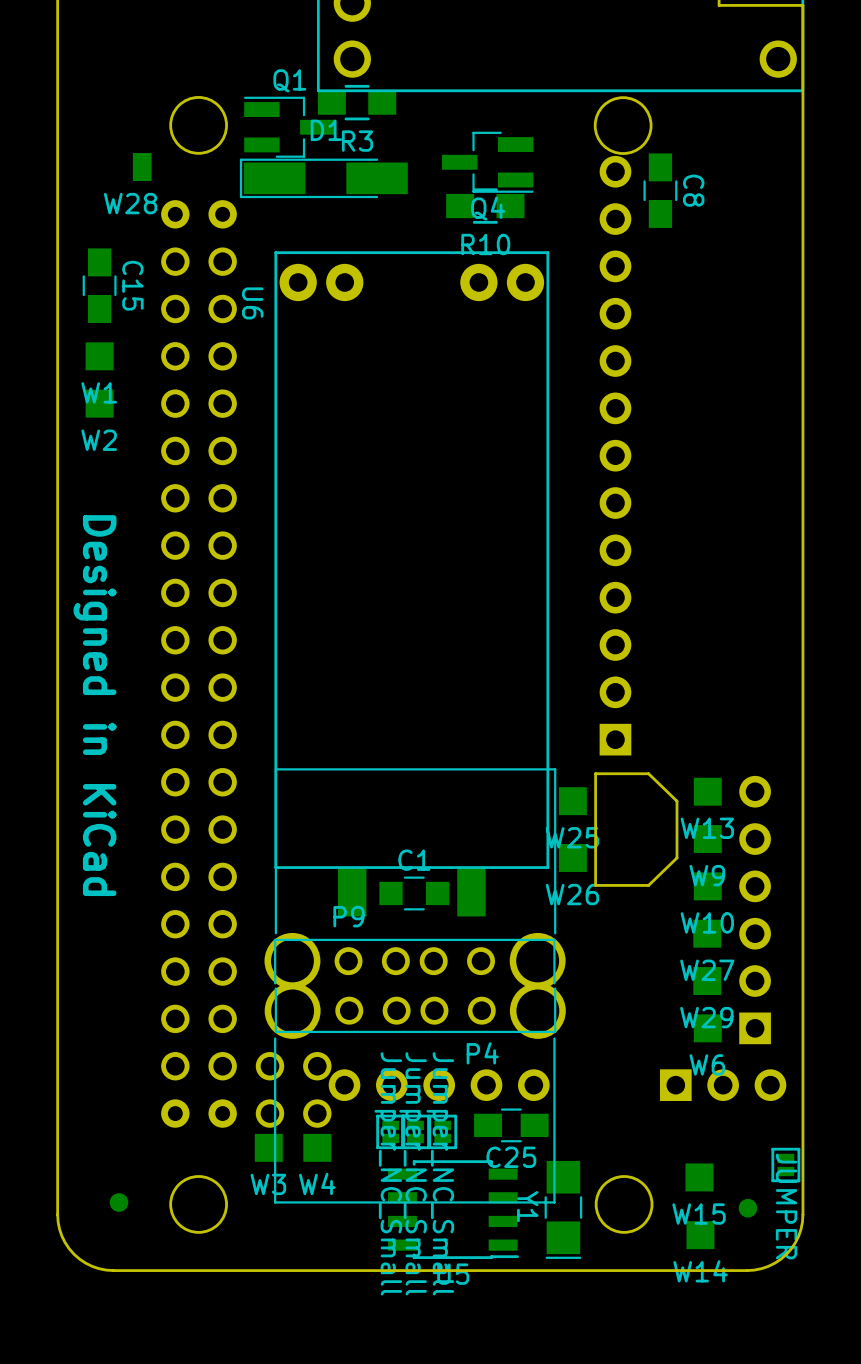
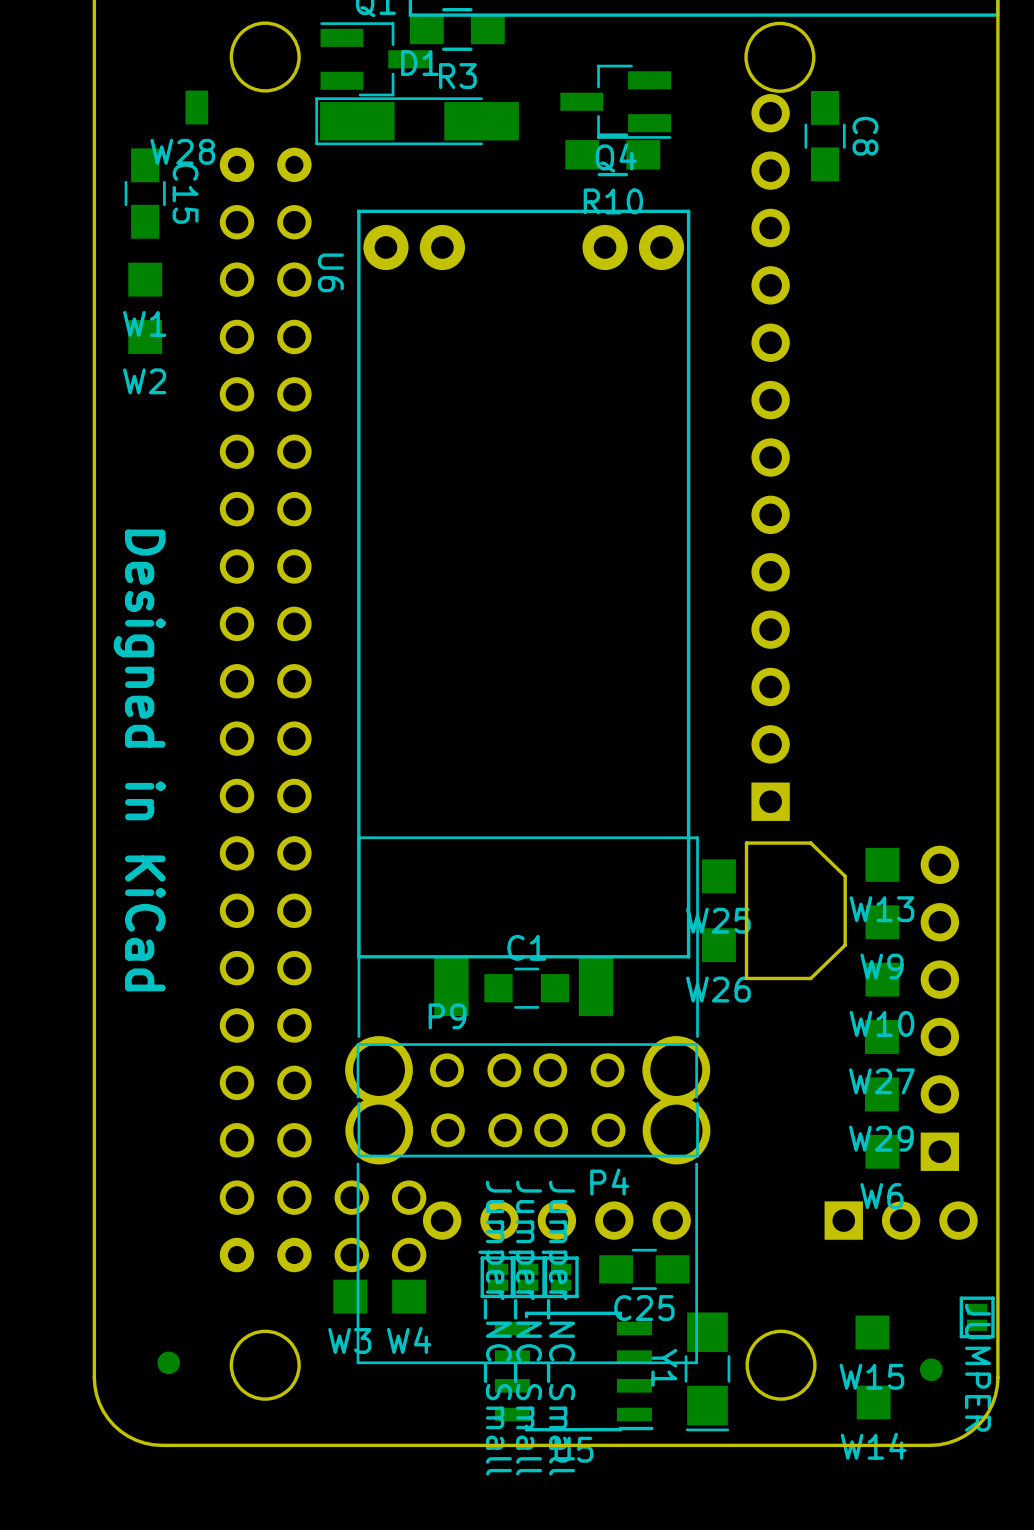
C15 position: (99, 285) -> (145, 193)
W1: none -> (145, 279)
W1 name: W1 (99, 392) -> W2 (144, 381)
W2: (99, 403) -> none

